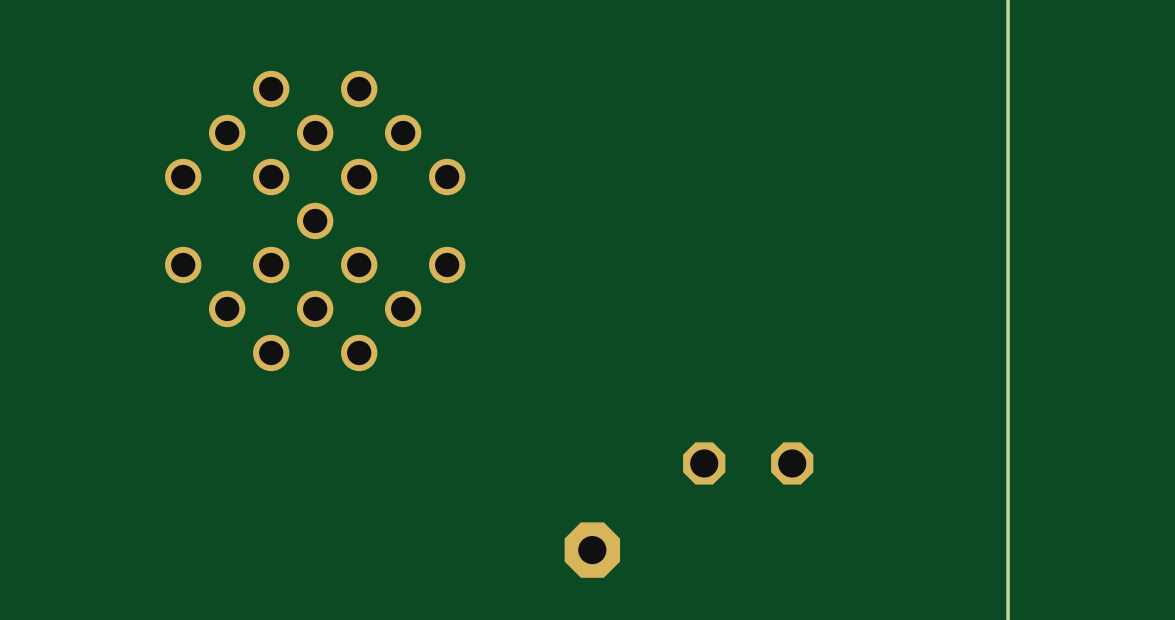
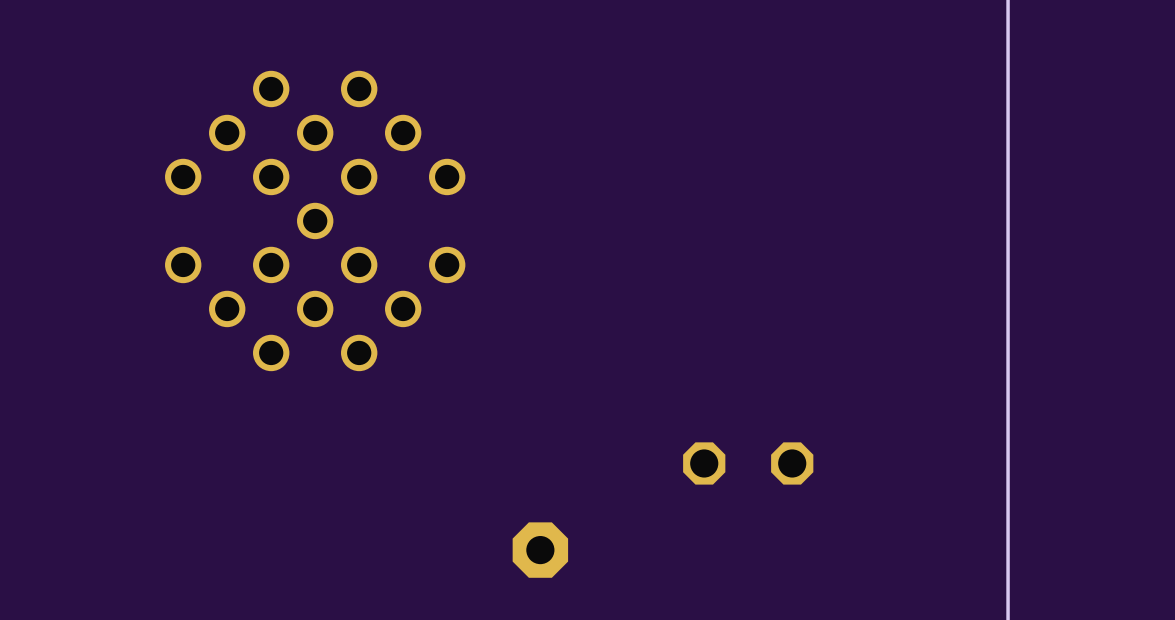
part position: (592, 550) -> (540, 550)

